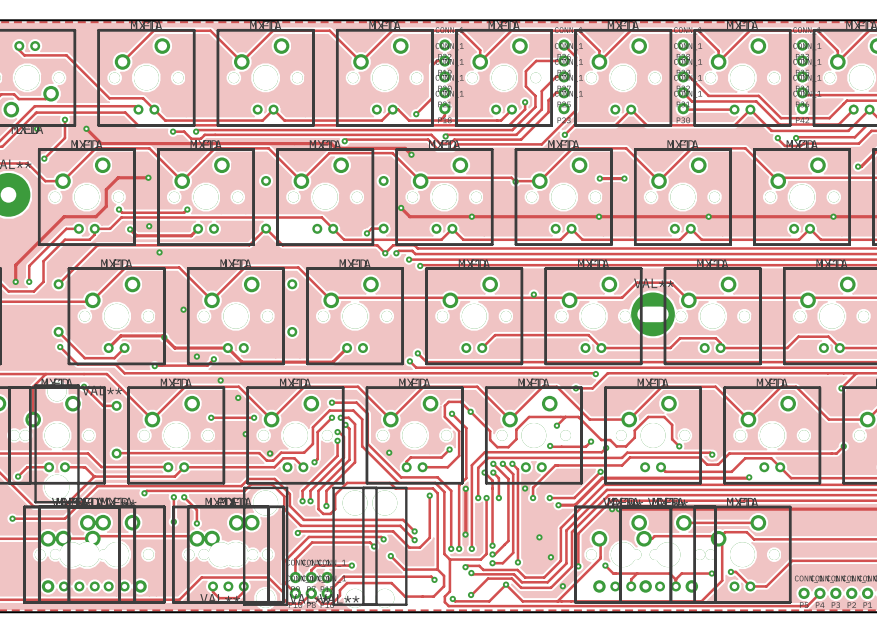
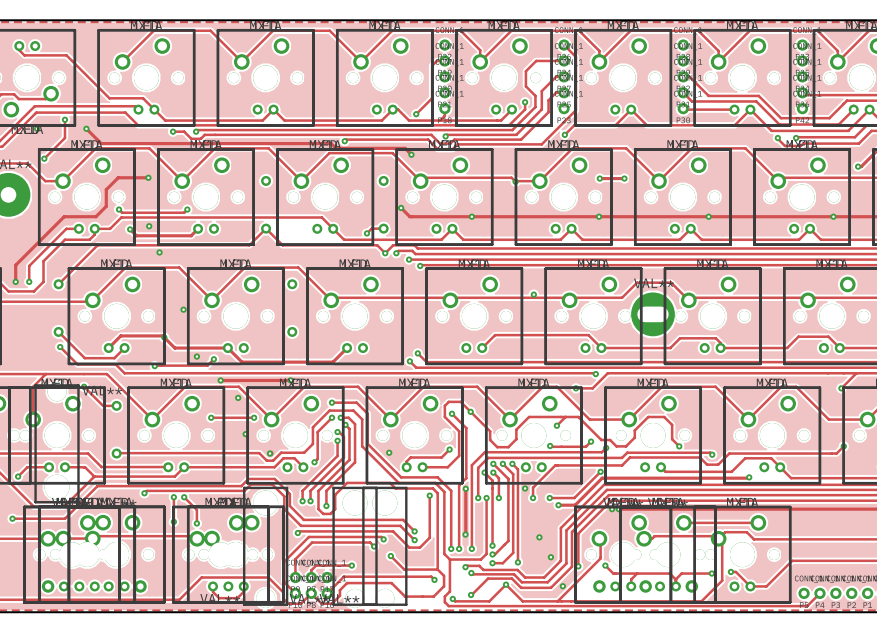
track: none -> (220, 380) (290, 380)
via: none -> (290, 380)

